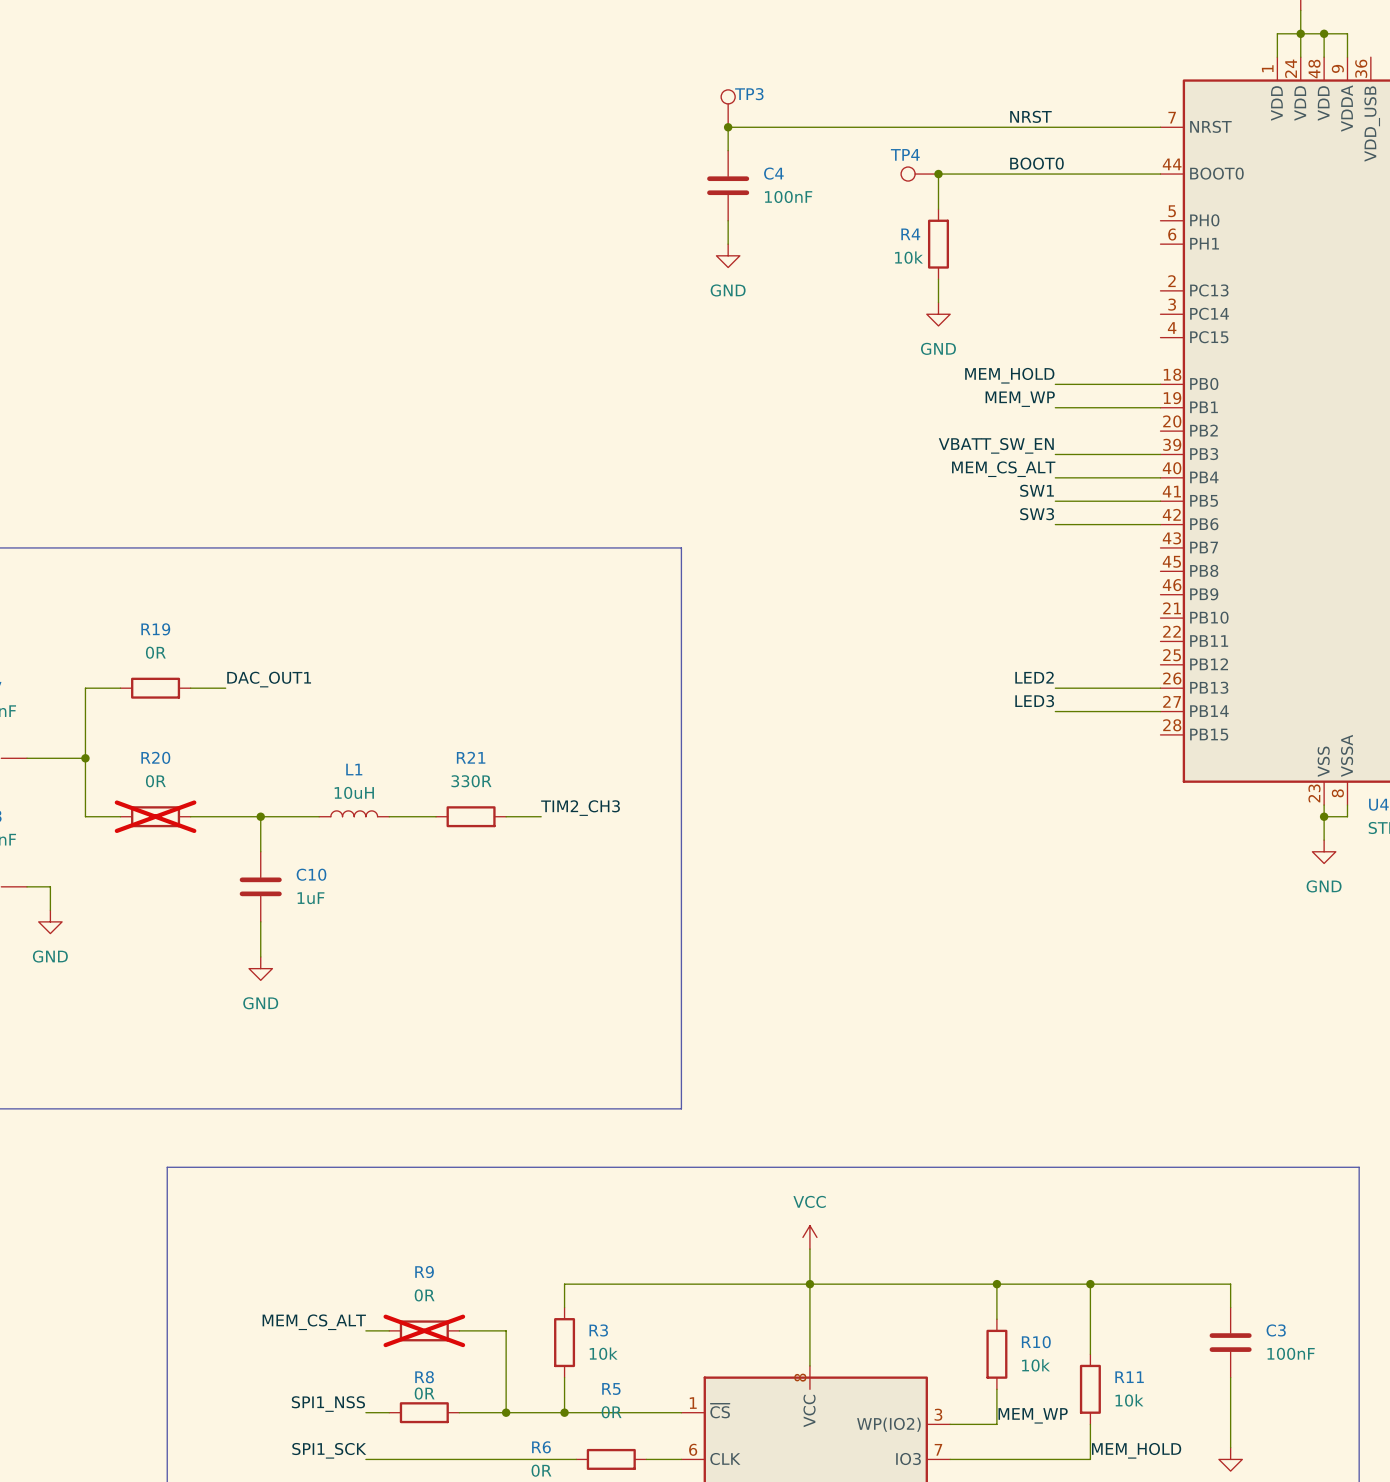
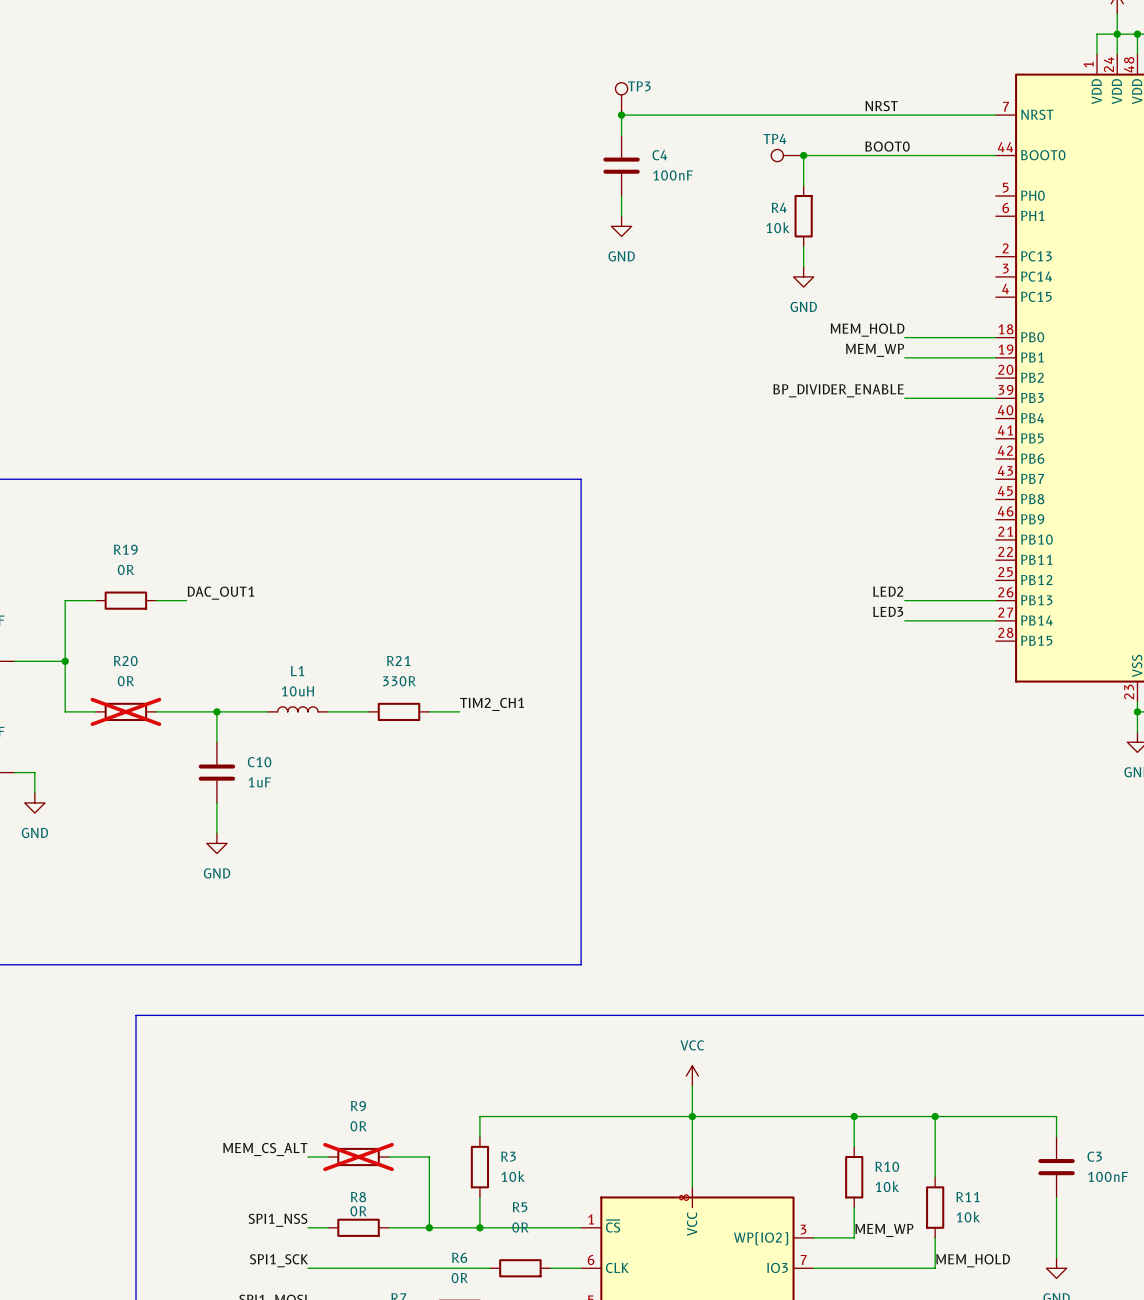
label: VBATT_SW_EN (996, 445) -> BP_DIVIDER_ENABLE (838, 390)
label: MEM_CS_ALT (1003, 469) -> none
wire: (1055, 477) (1160, 477) -> none
label: SW1 (1037, 490) -> none
wire: (1055, 501) (1160, 501) -> none
label: SW3 (1037, 514) -> none
wire: (1055, 524) (1160, 524) -> none
label: TIM2_CH3 (580, 808) -> TIM2_CH1 (492, 704)

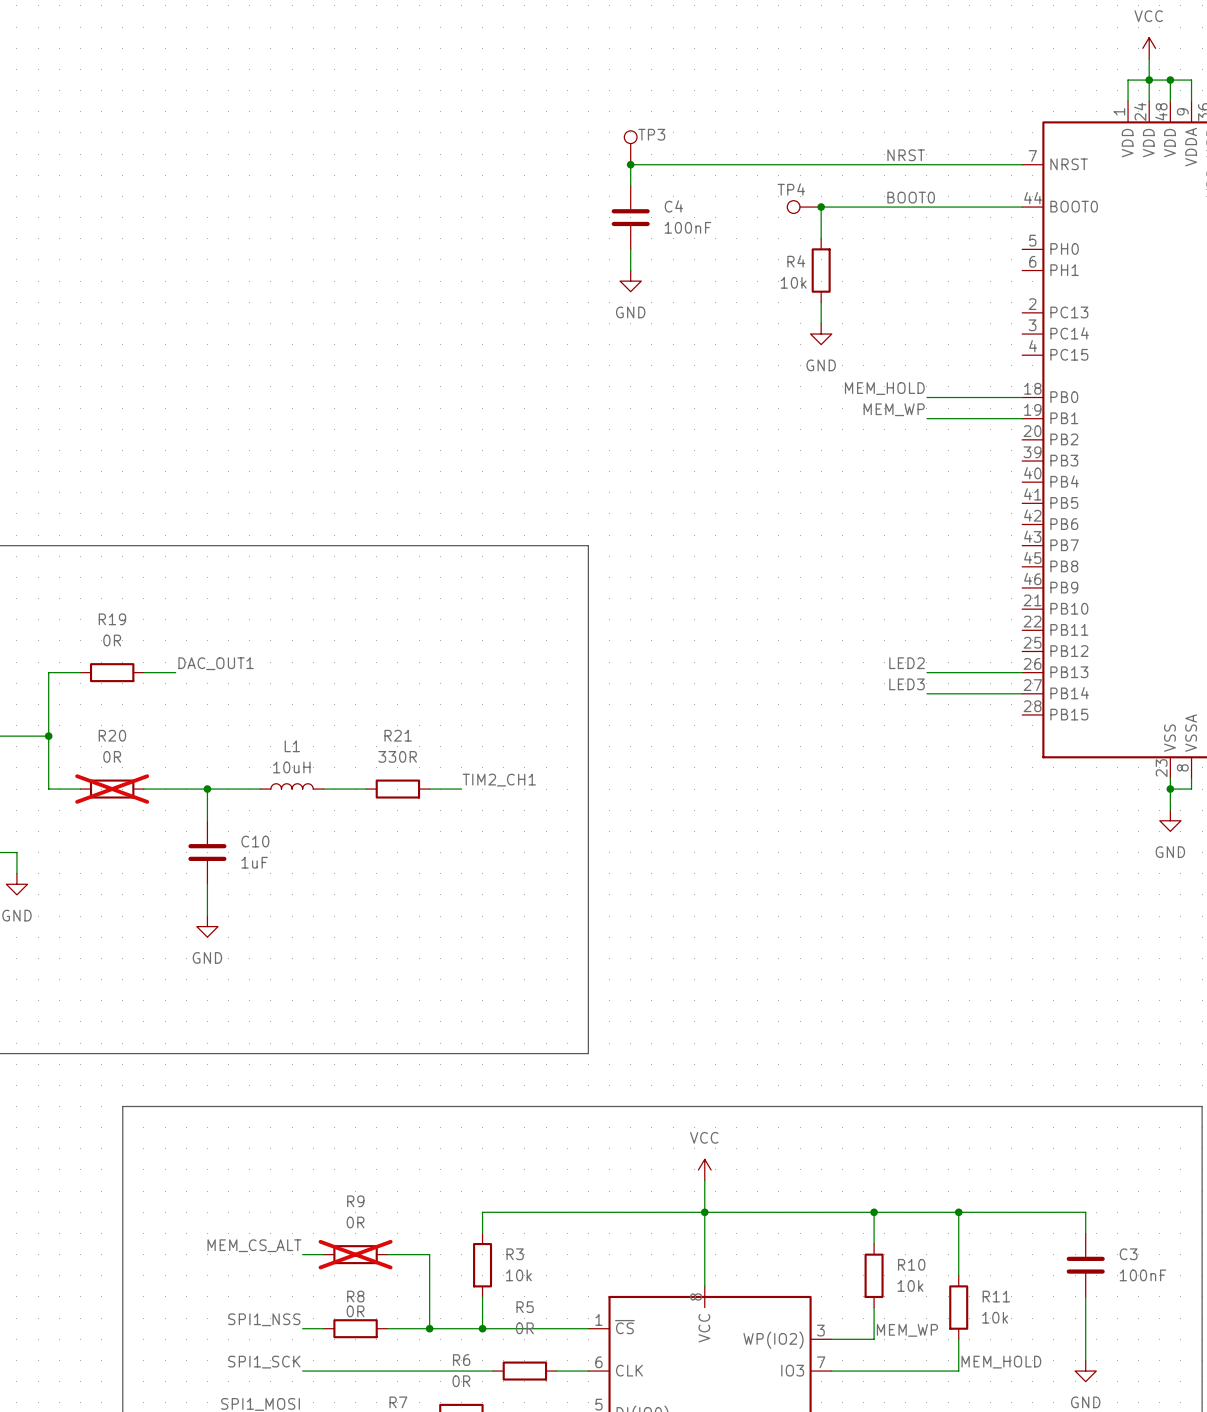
label: BP_DIVIDER_ENABLE (838, 390) -> none
wire: (904, 398) (995, 398) -> none

